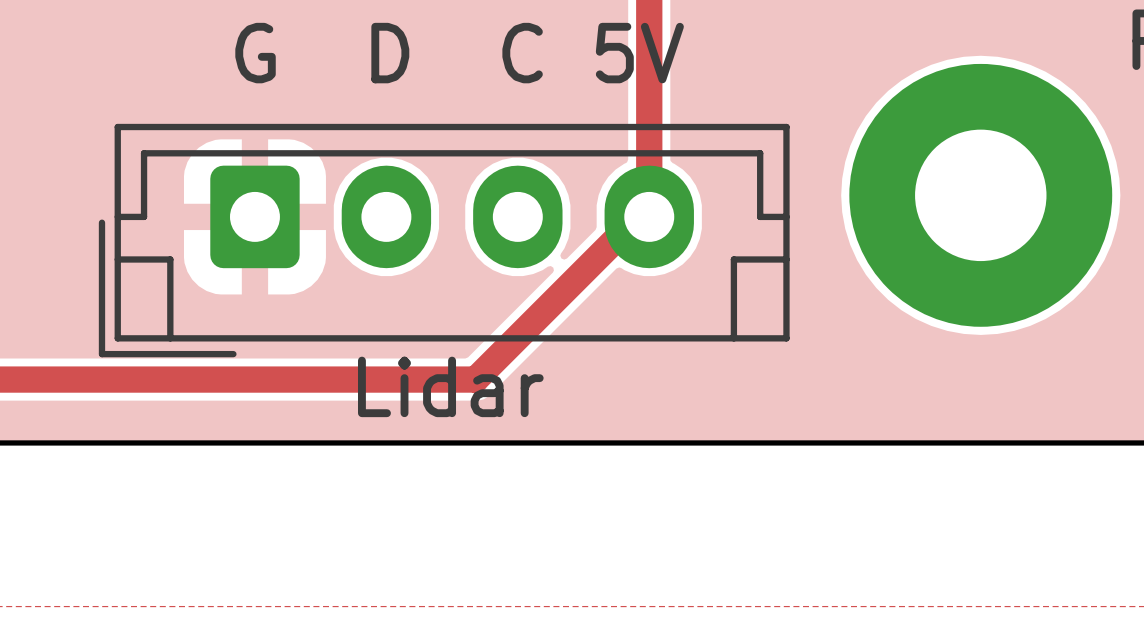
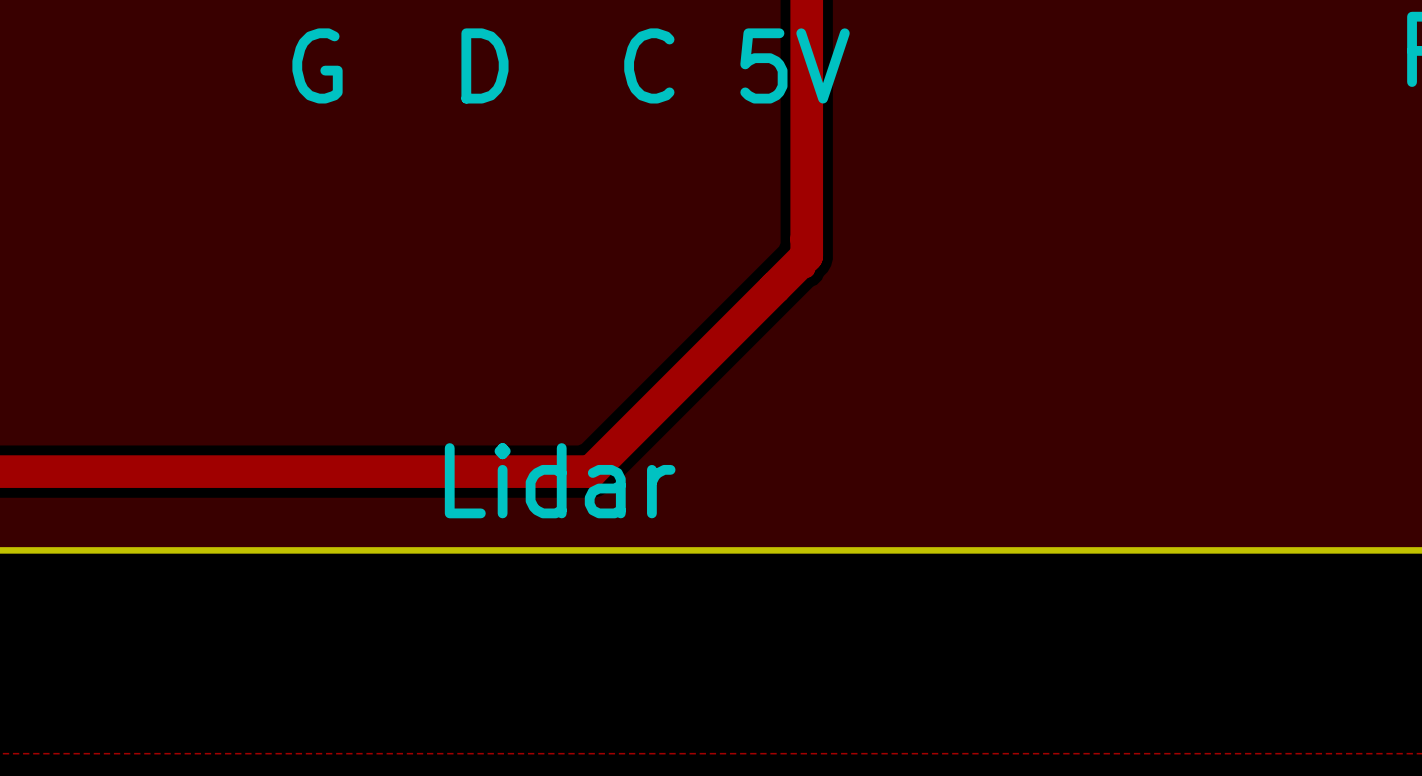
part: (980, 195) -> none
part: (444, 240) -> none

